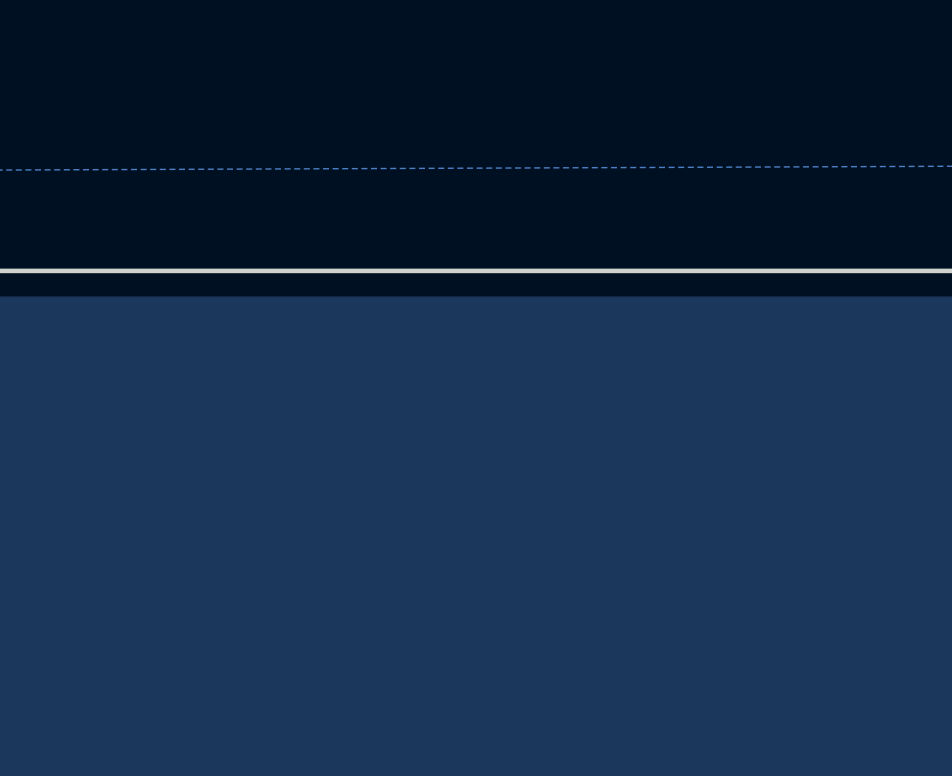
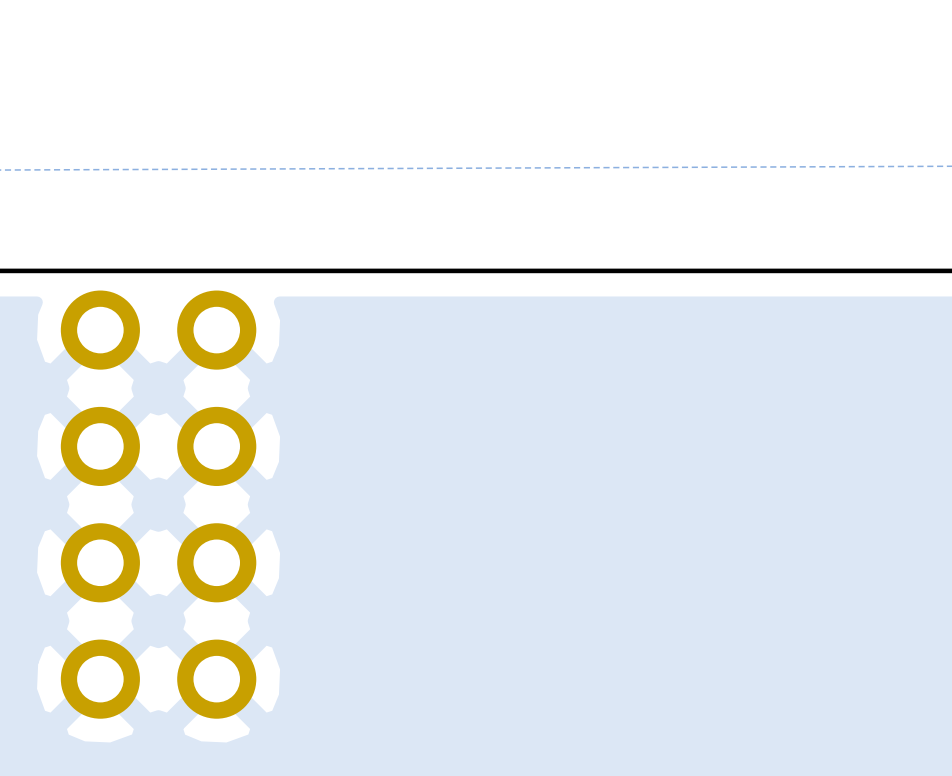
part: none -> (158, 504)

